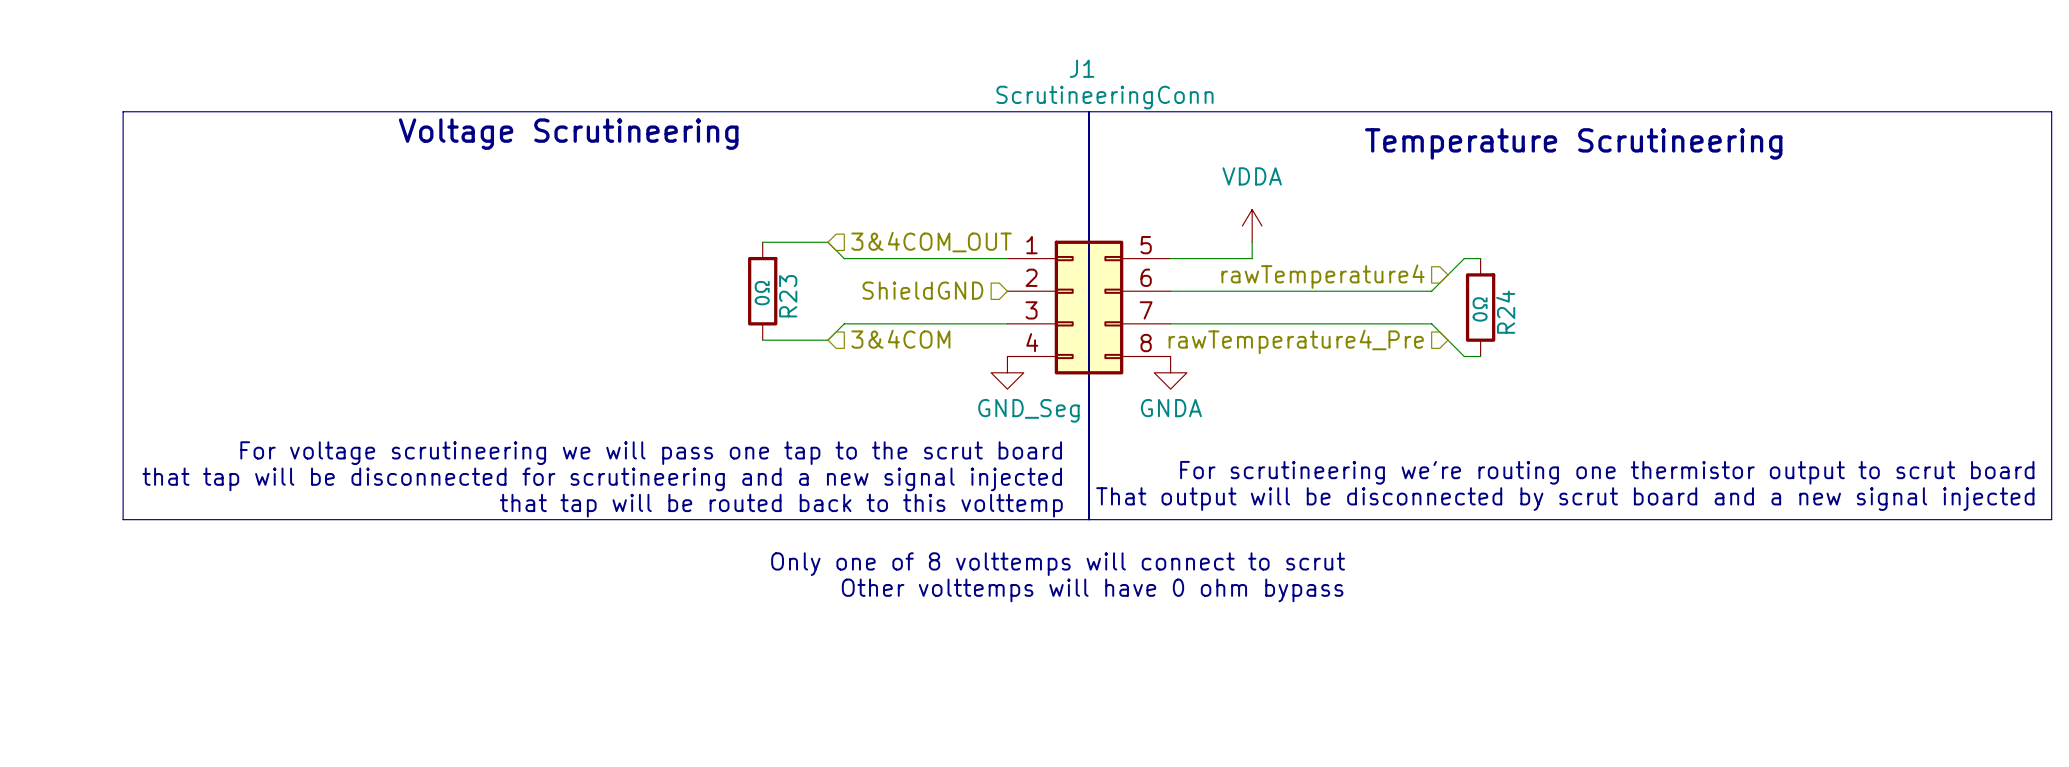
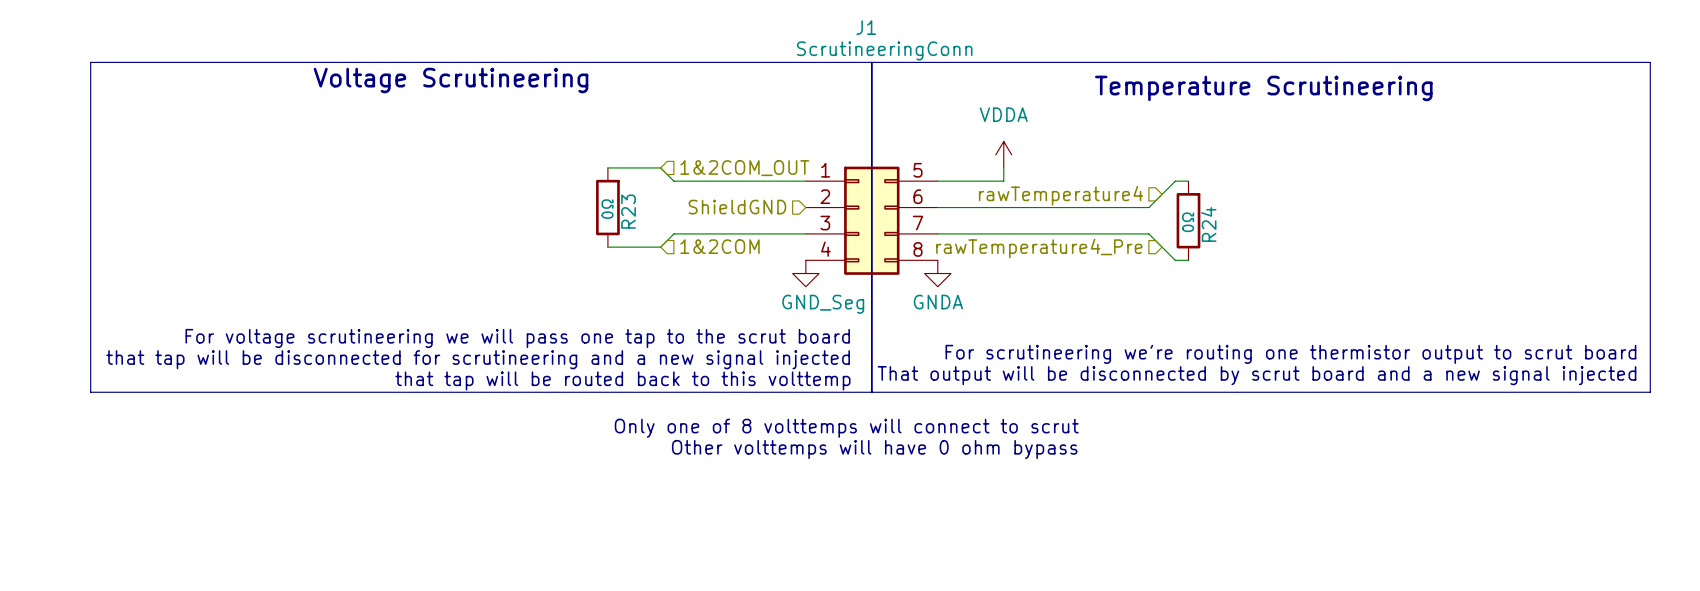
hierarchical label: 3&4COM_OUT (931, 242) -> 1&2COM_OUT (744, 168)
hierarchical label: 3&4COM (900, 339) -> 1&2COM (719, 246)

